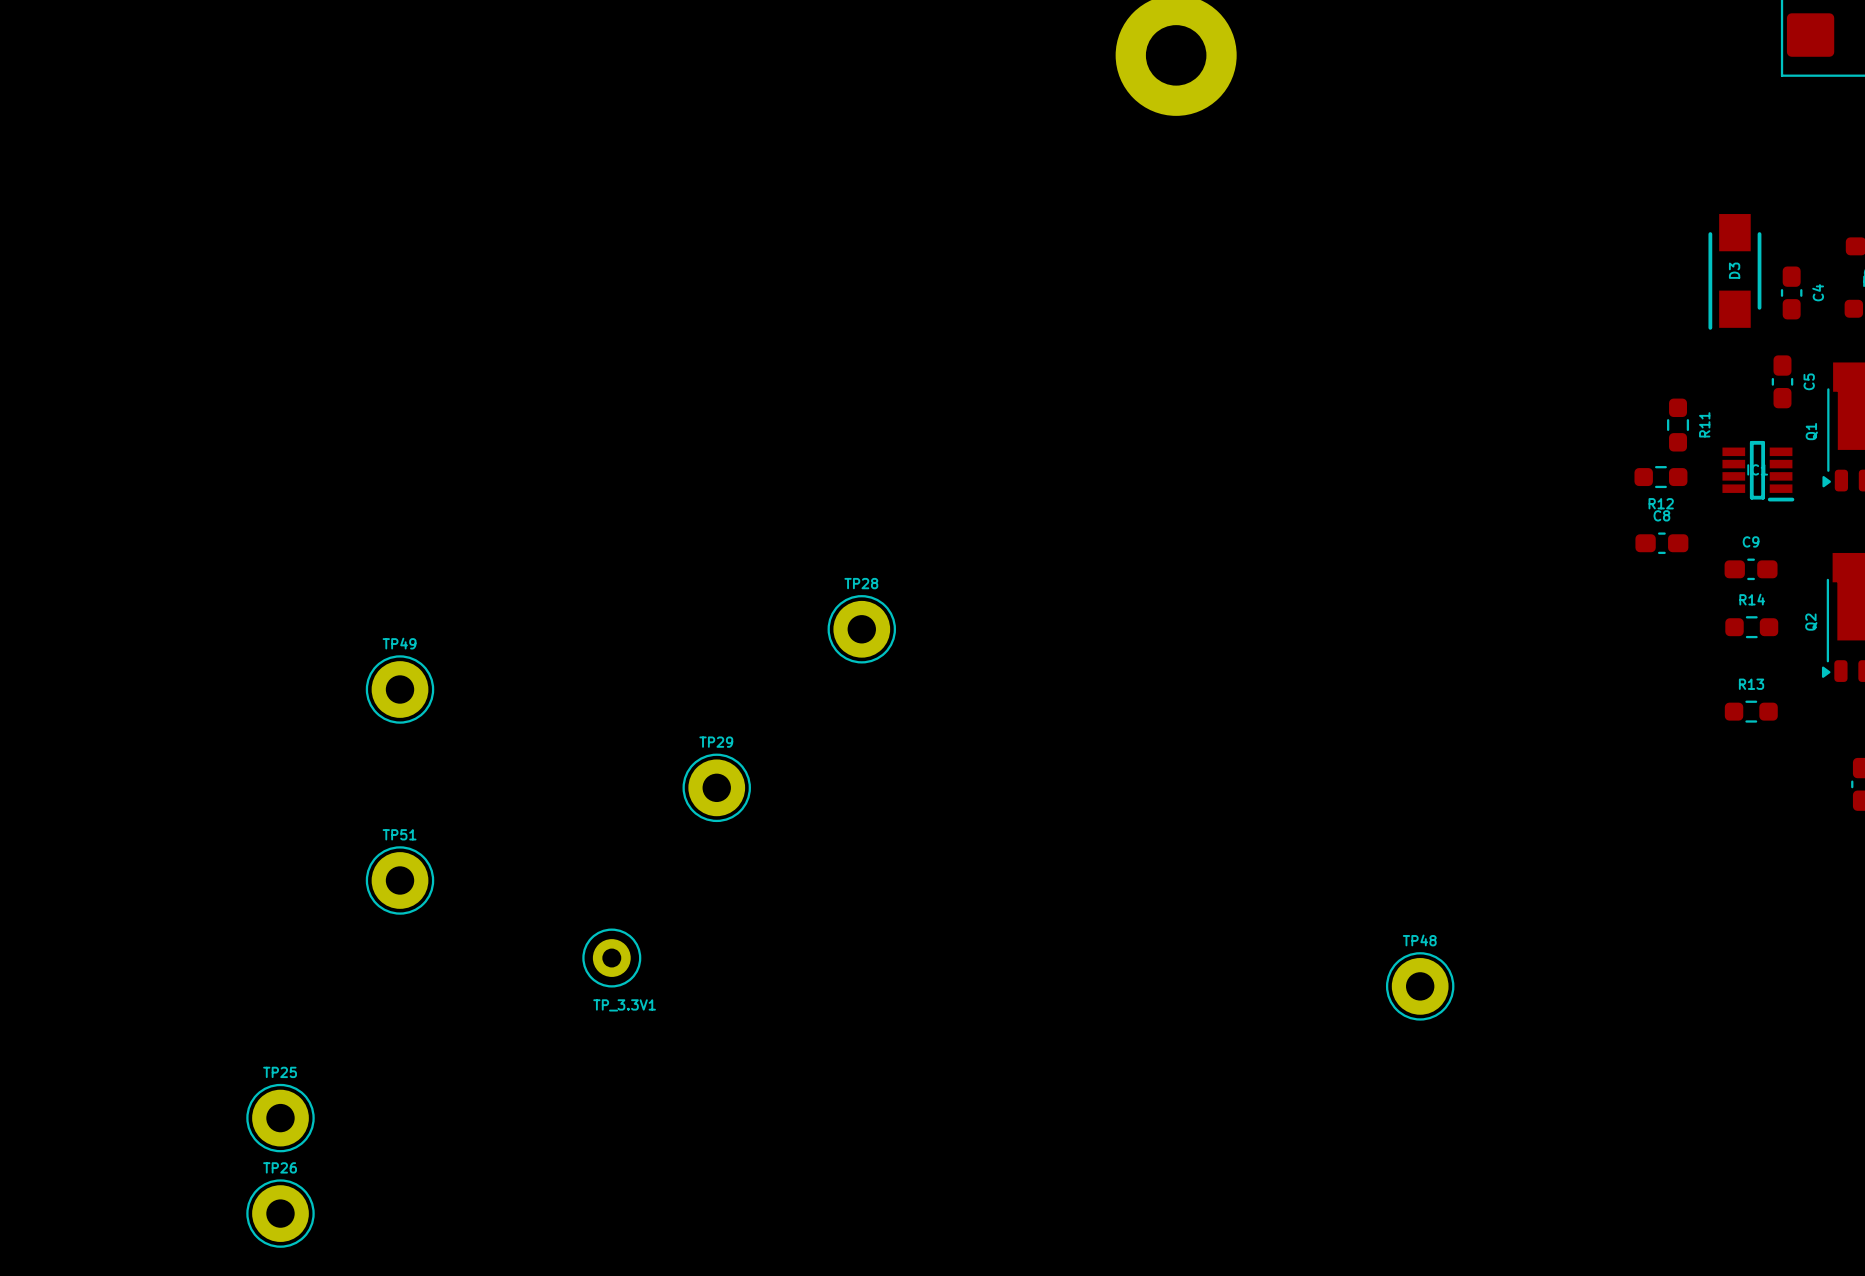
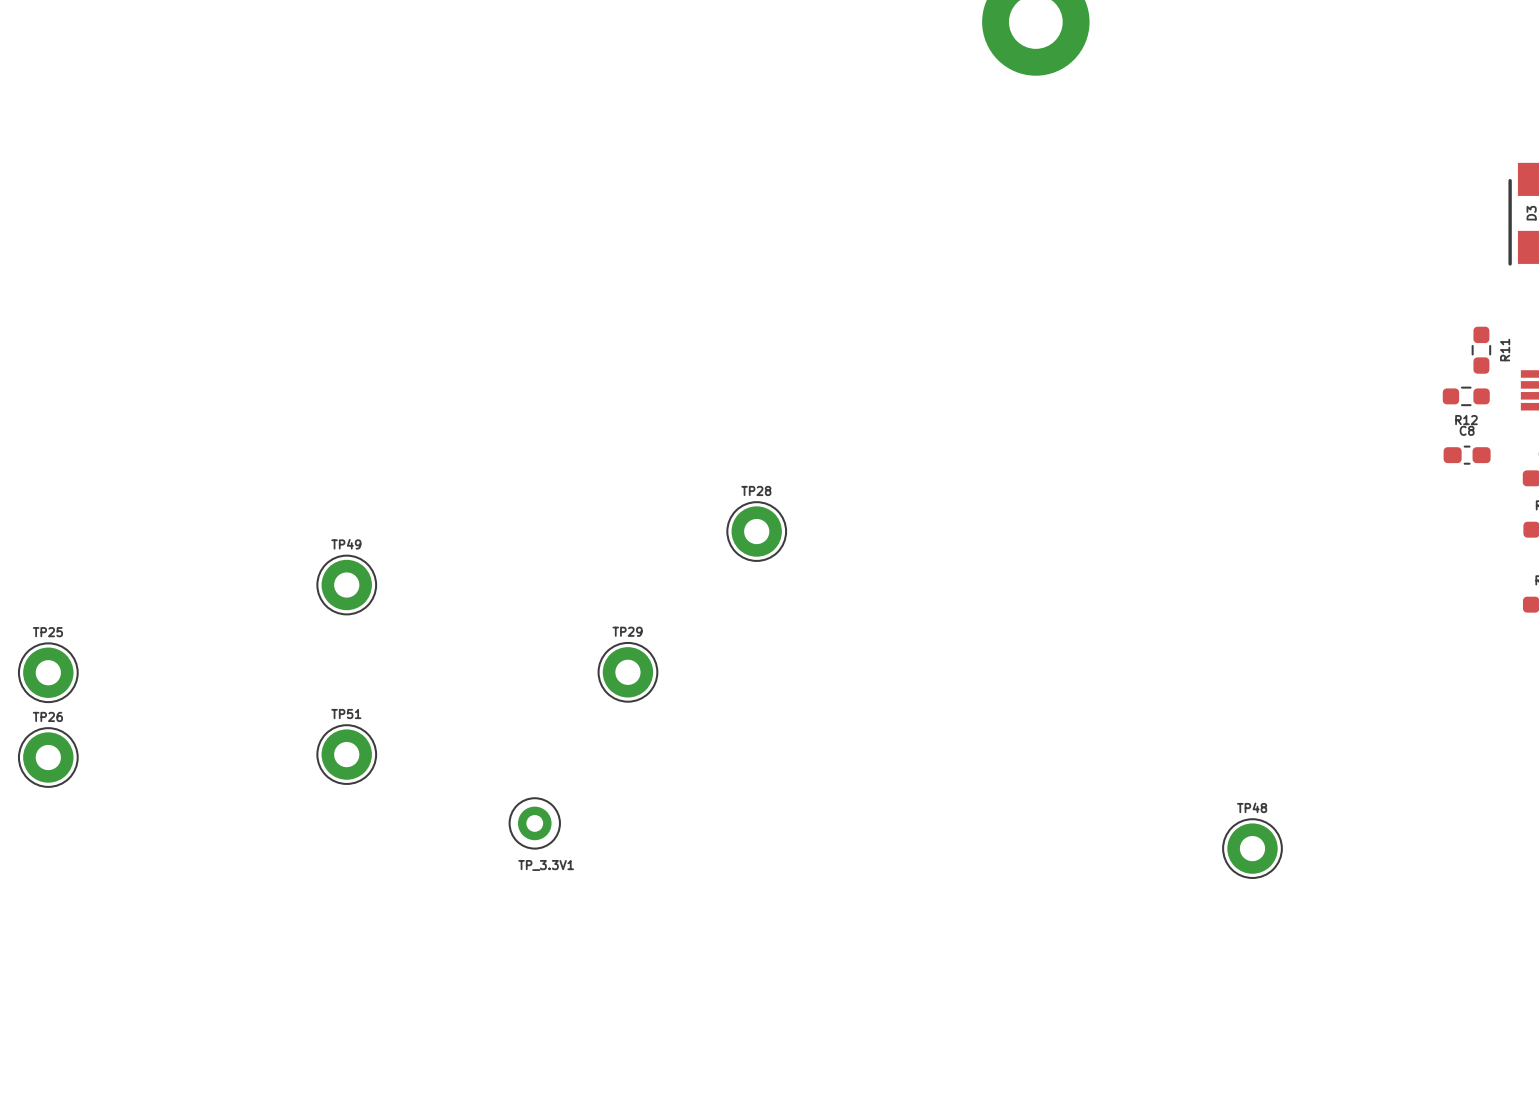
TP25 position: (280, 1118) -> (48, 672)
TP26 position: (280, 1213) -> (48, 757)

